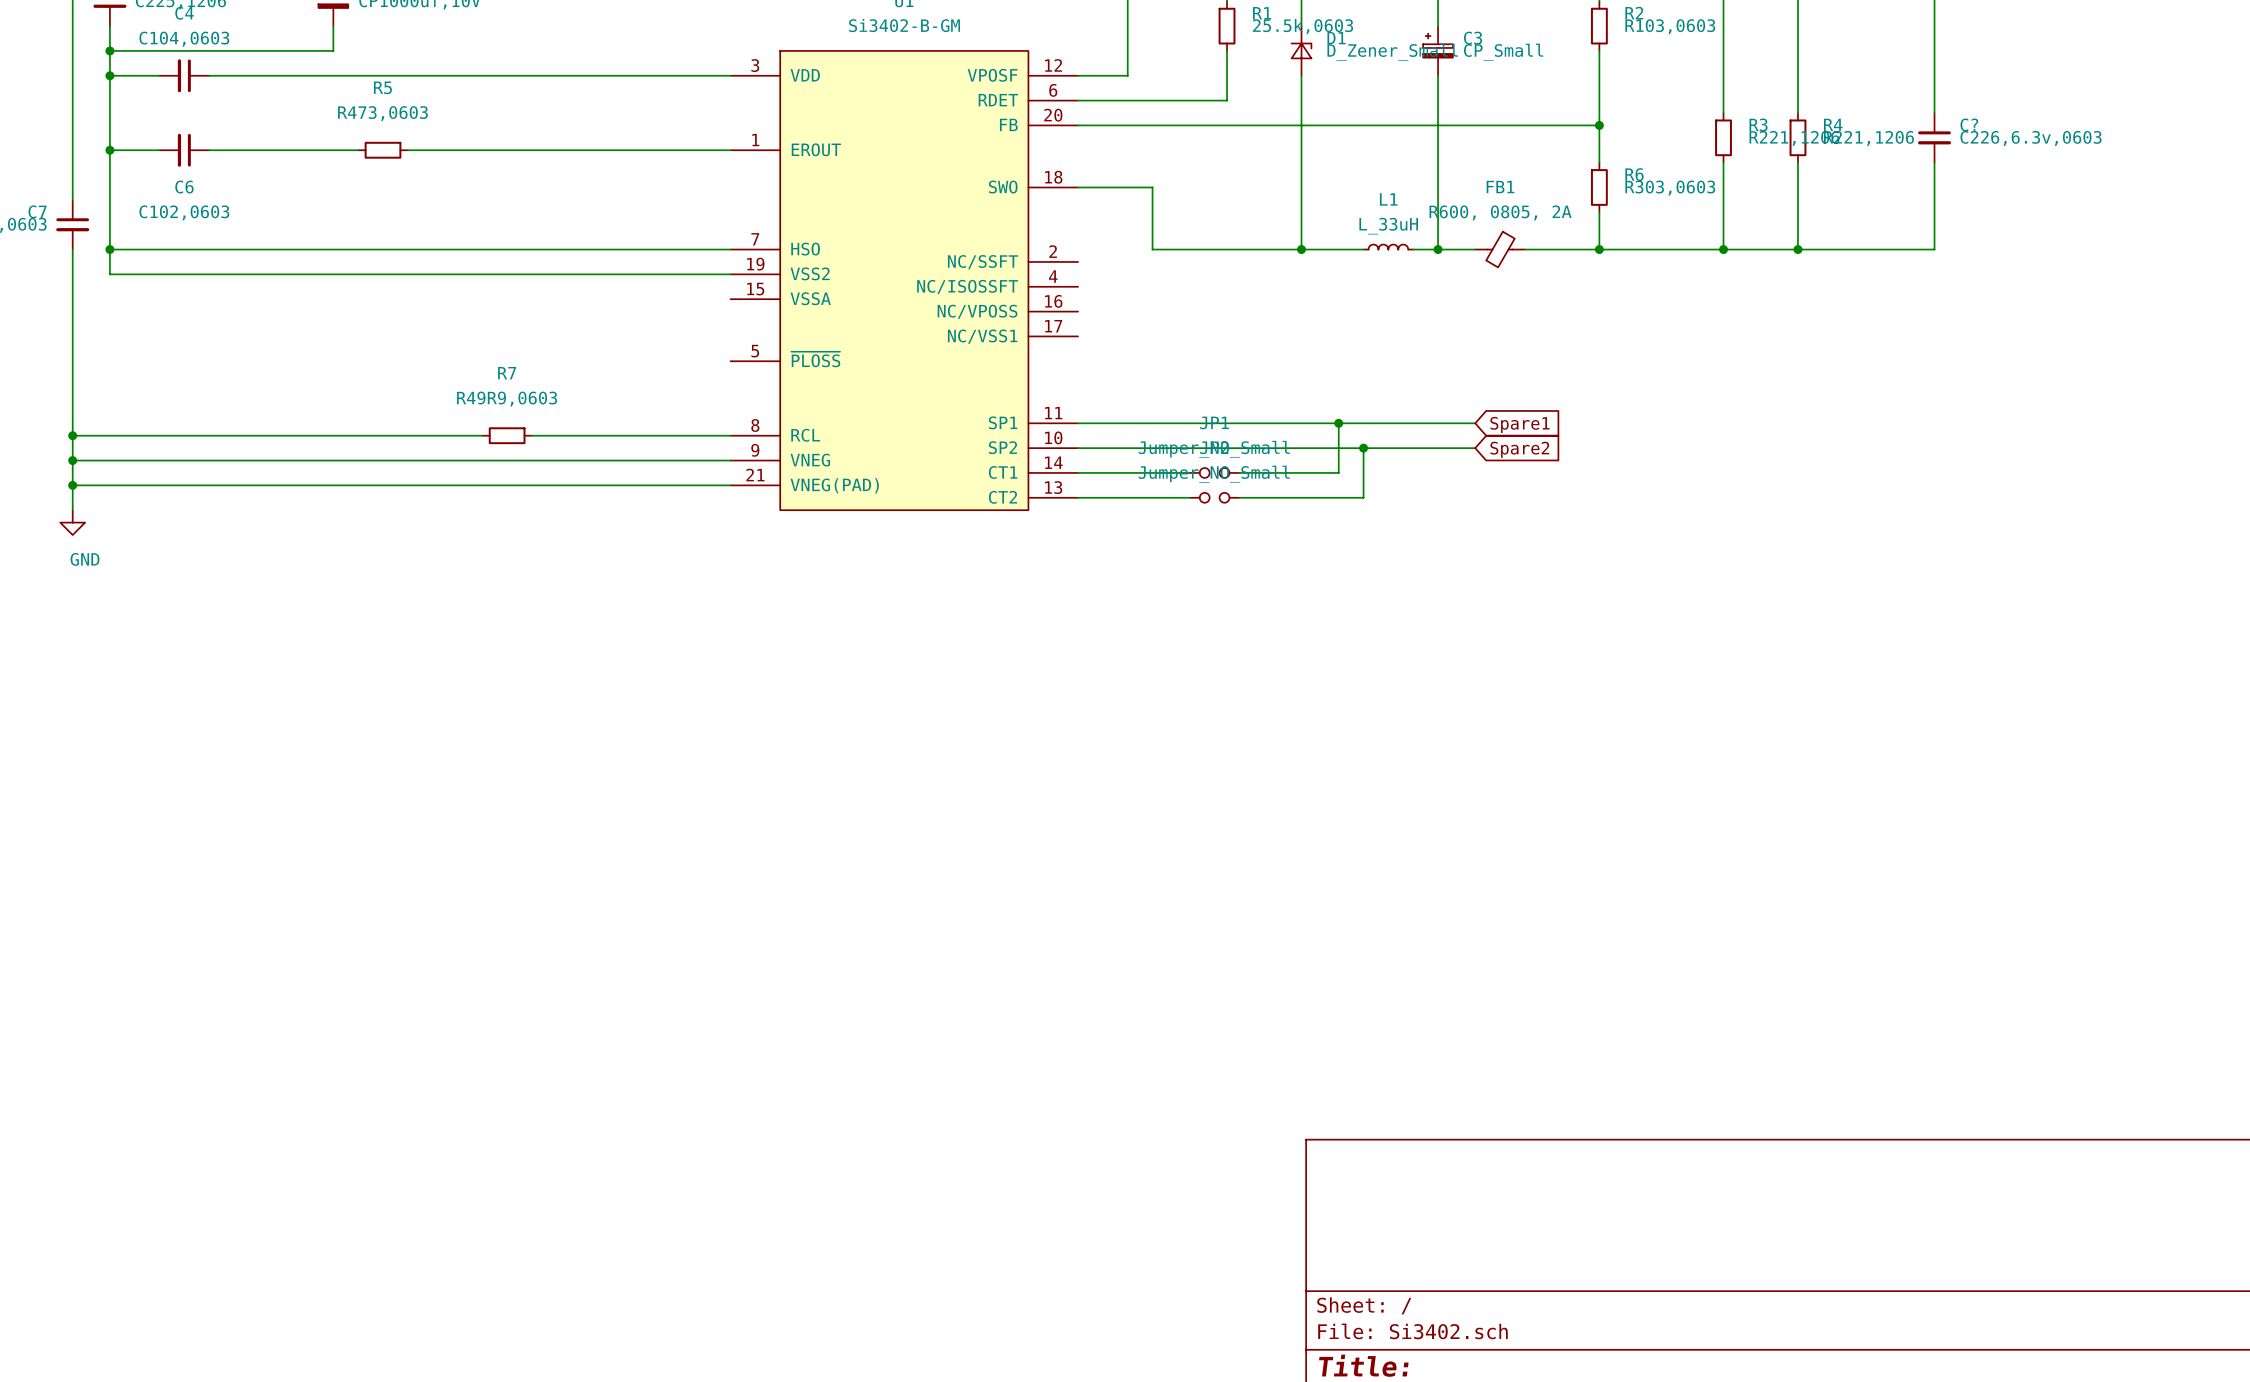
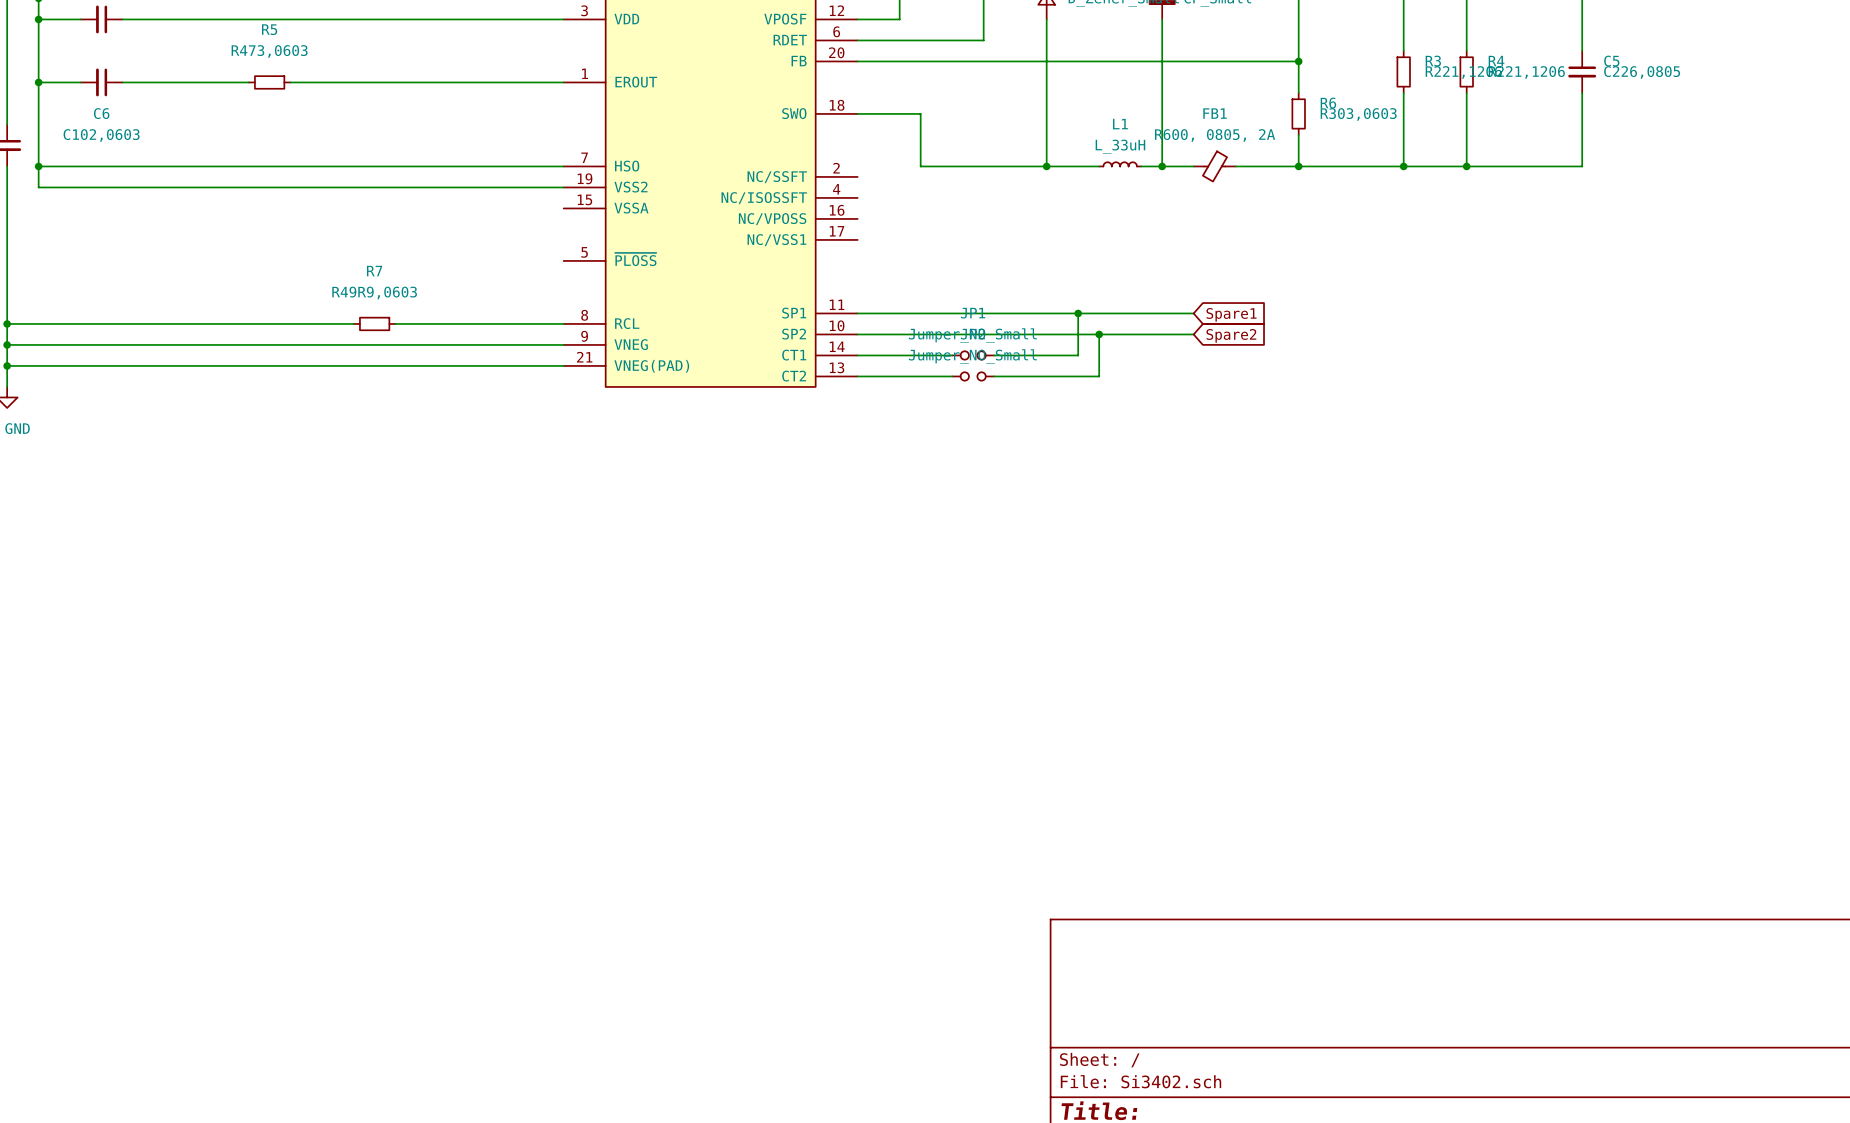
C? name: C? (1969, 124) -> C5 (1611, 61)
C? value: C226,6.3v,0603 (2031, 138) -> C226,0805 (1642, 72)

